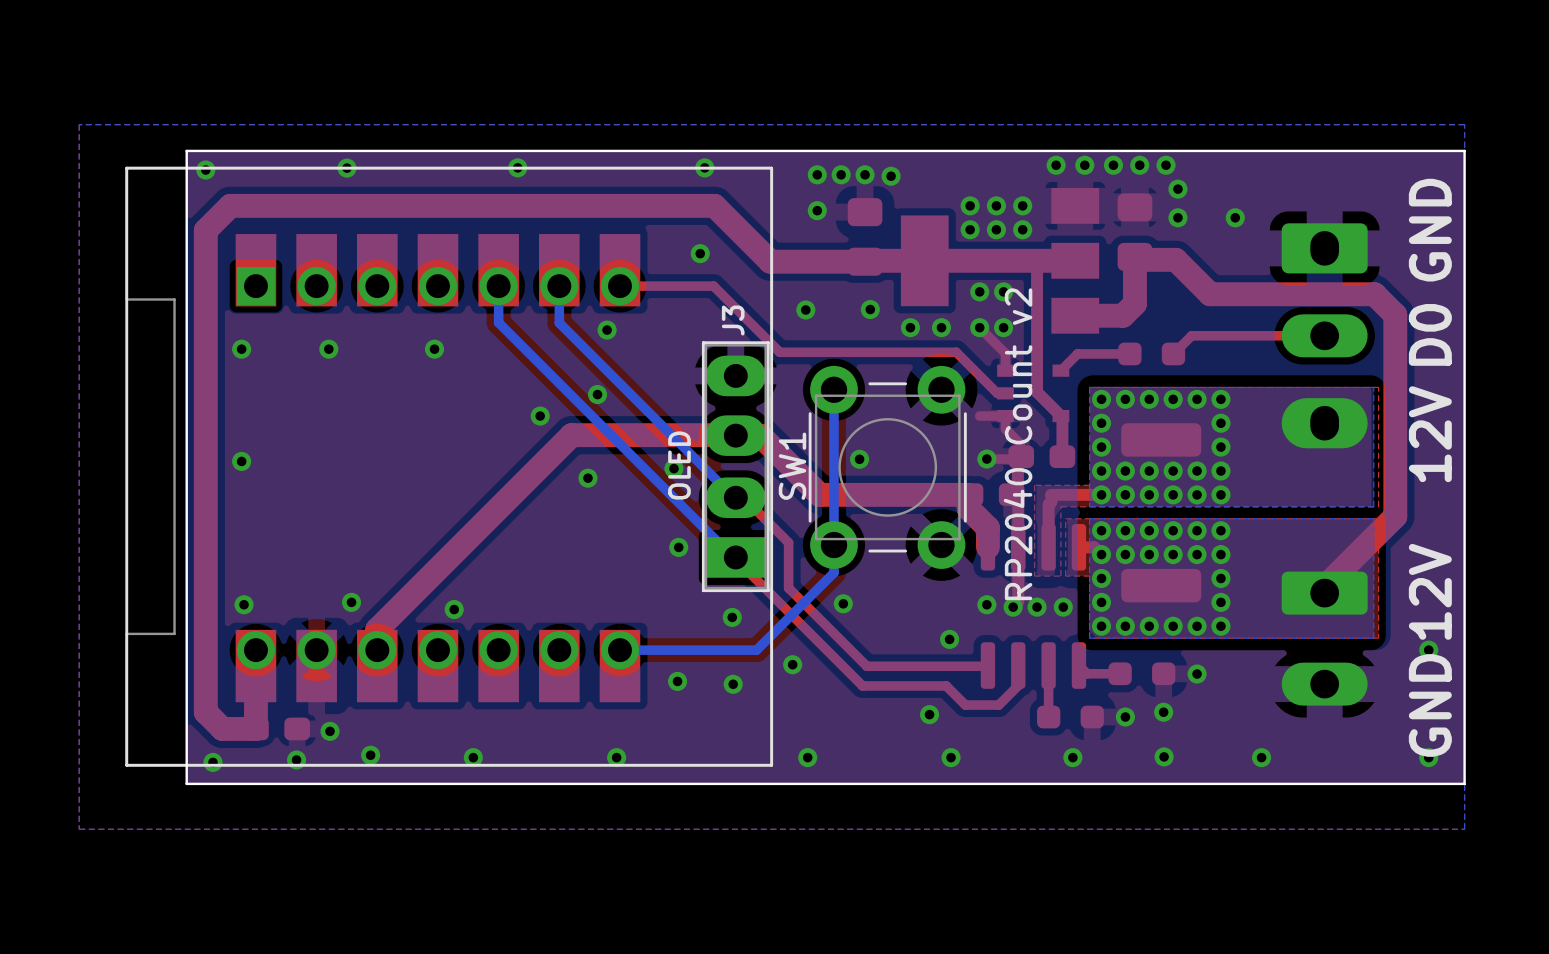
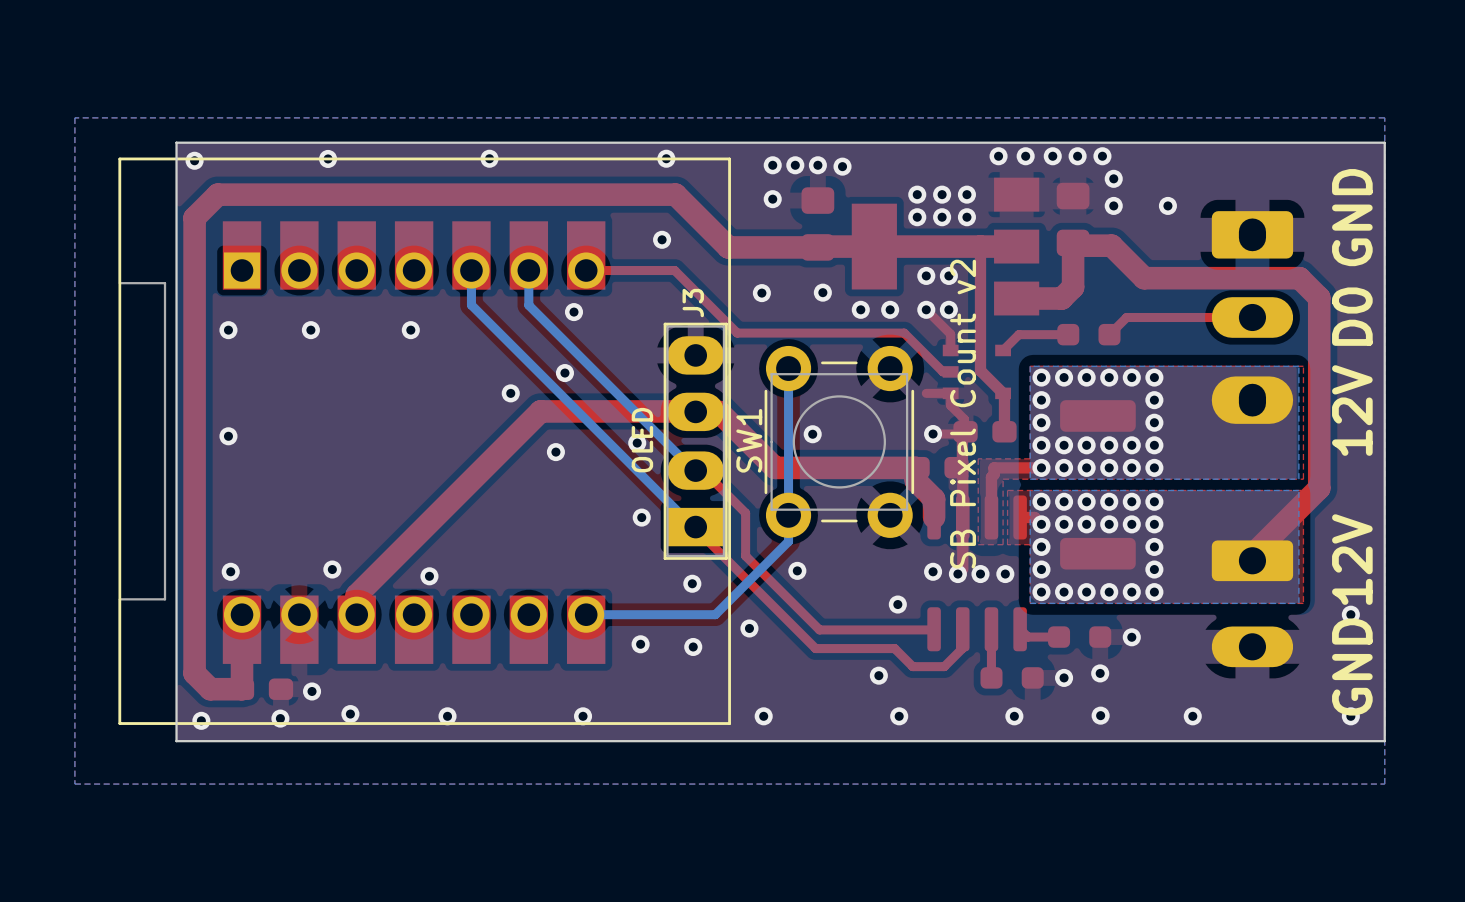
text: RP2040 Count v2 (1018, 444) -> SB Pixel Count v2 (963, 414)

